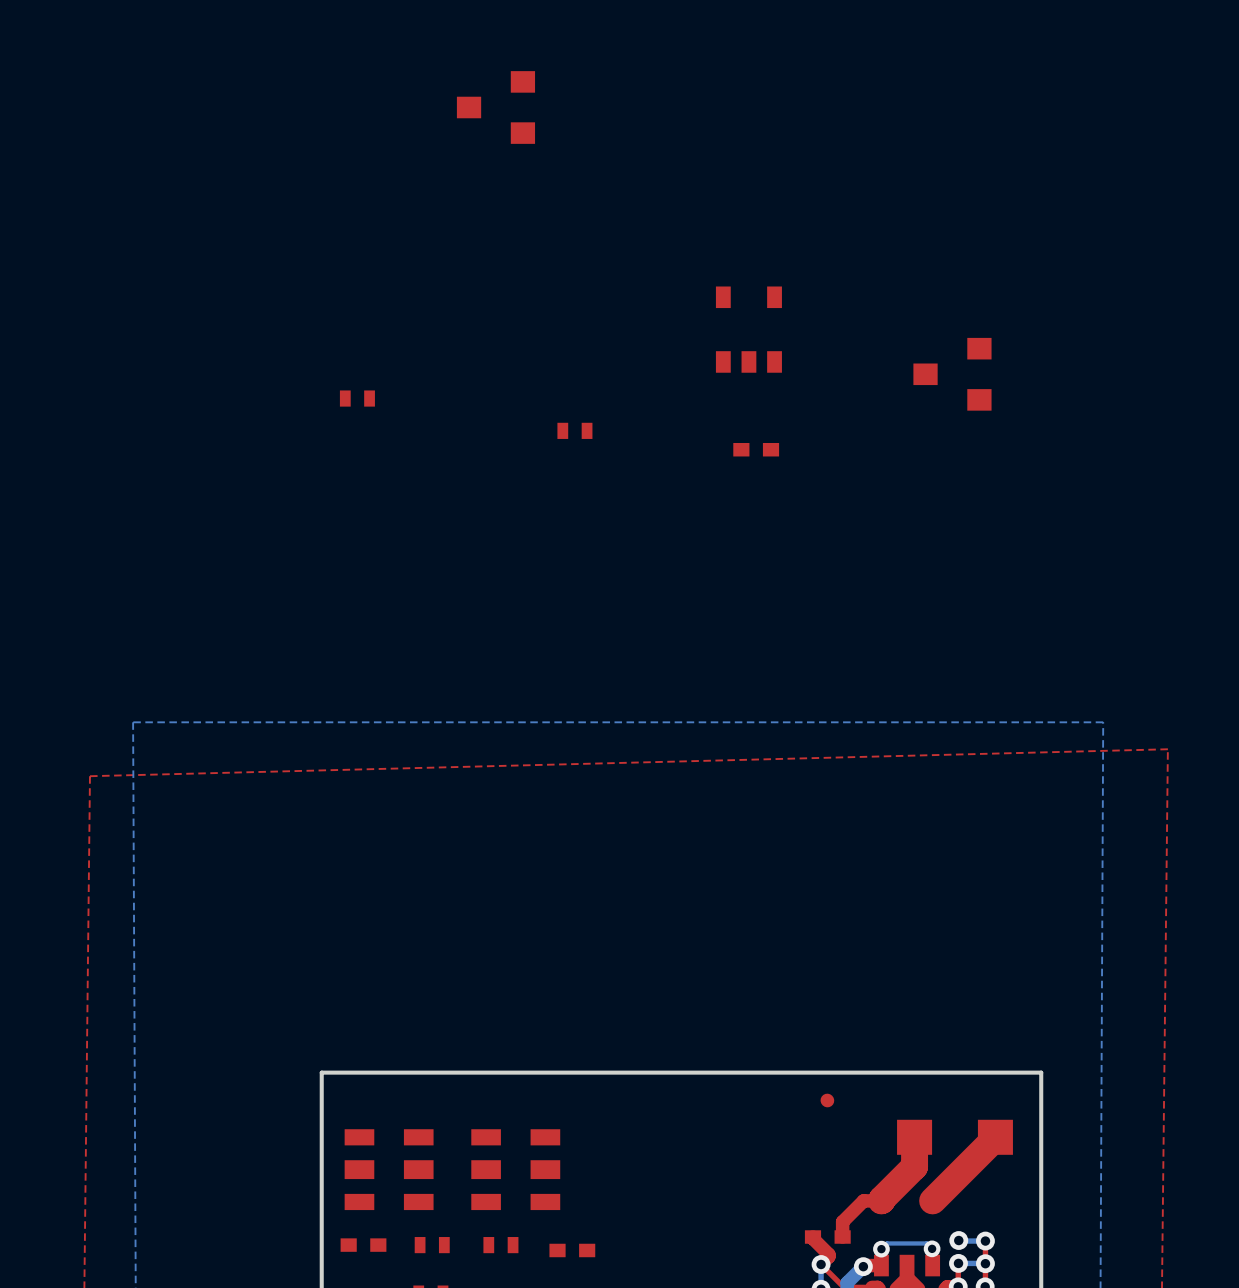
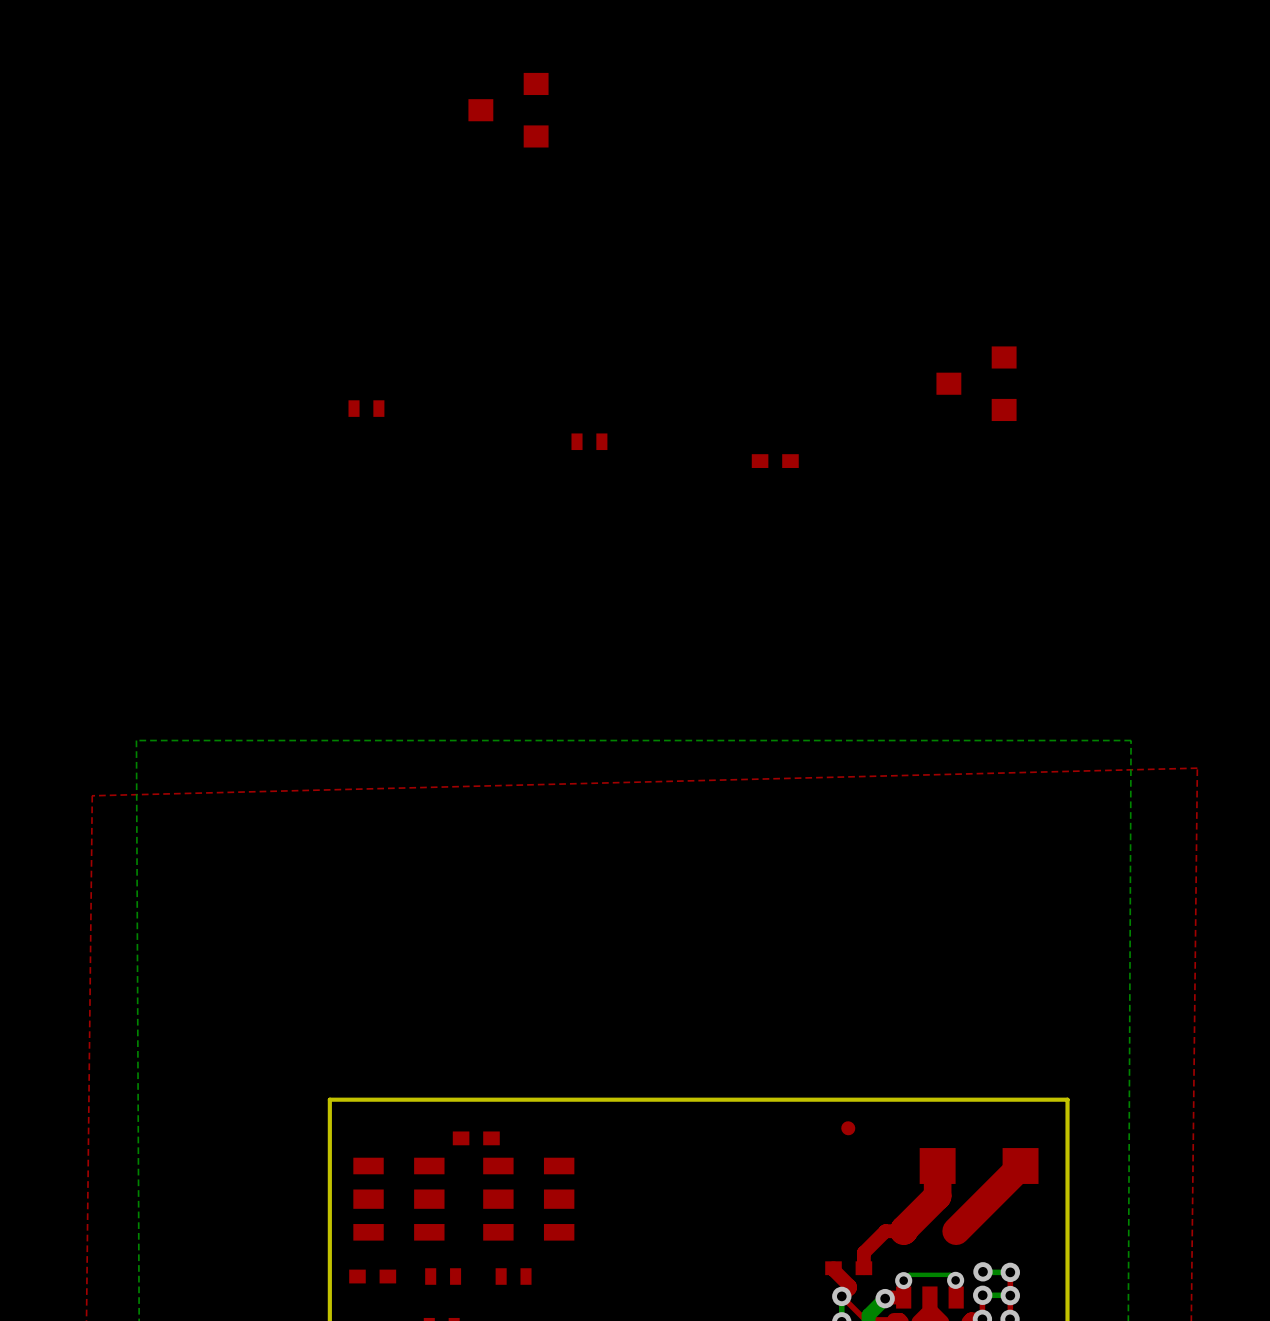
part: (748, 329) -> none
part position: (572, 1250) -> (476, 1138)

